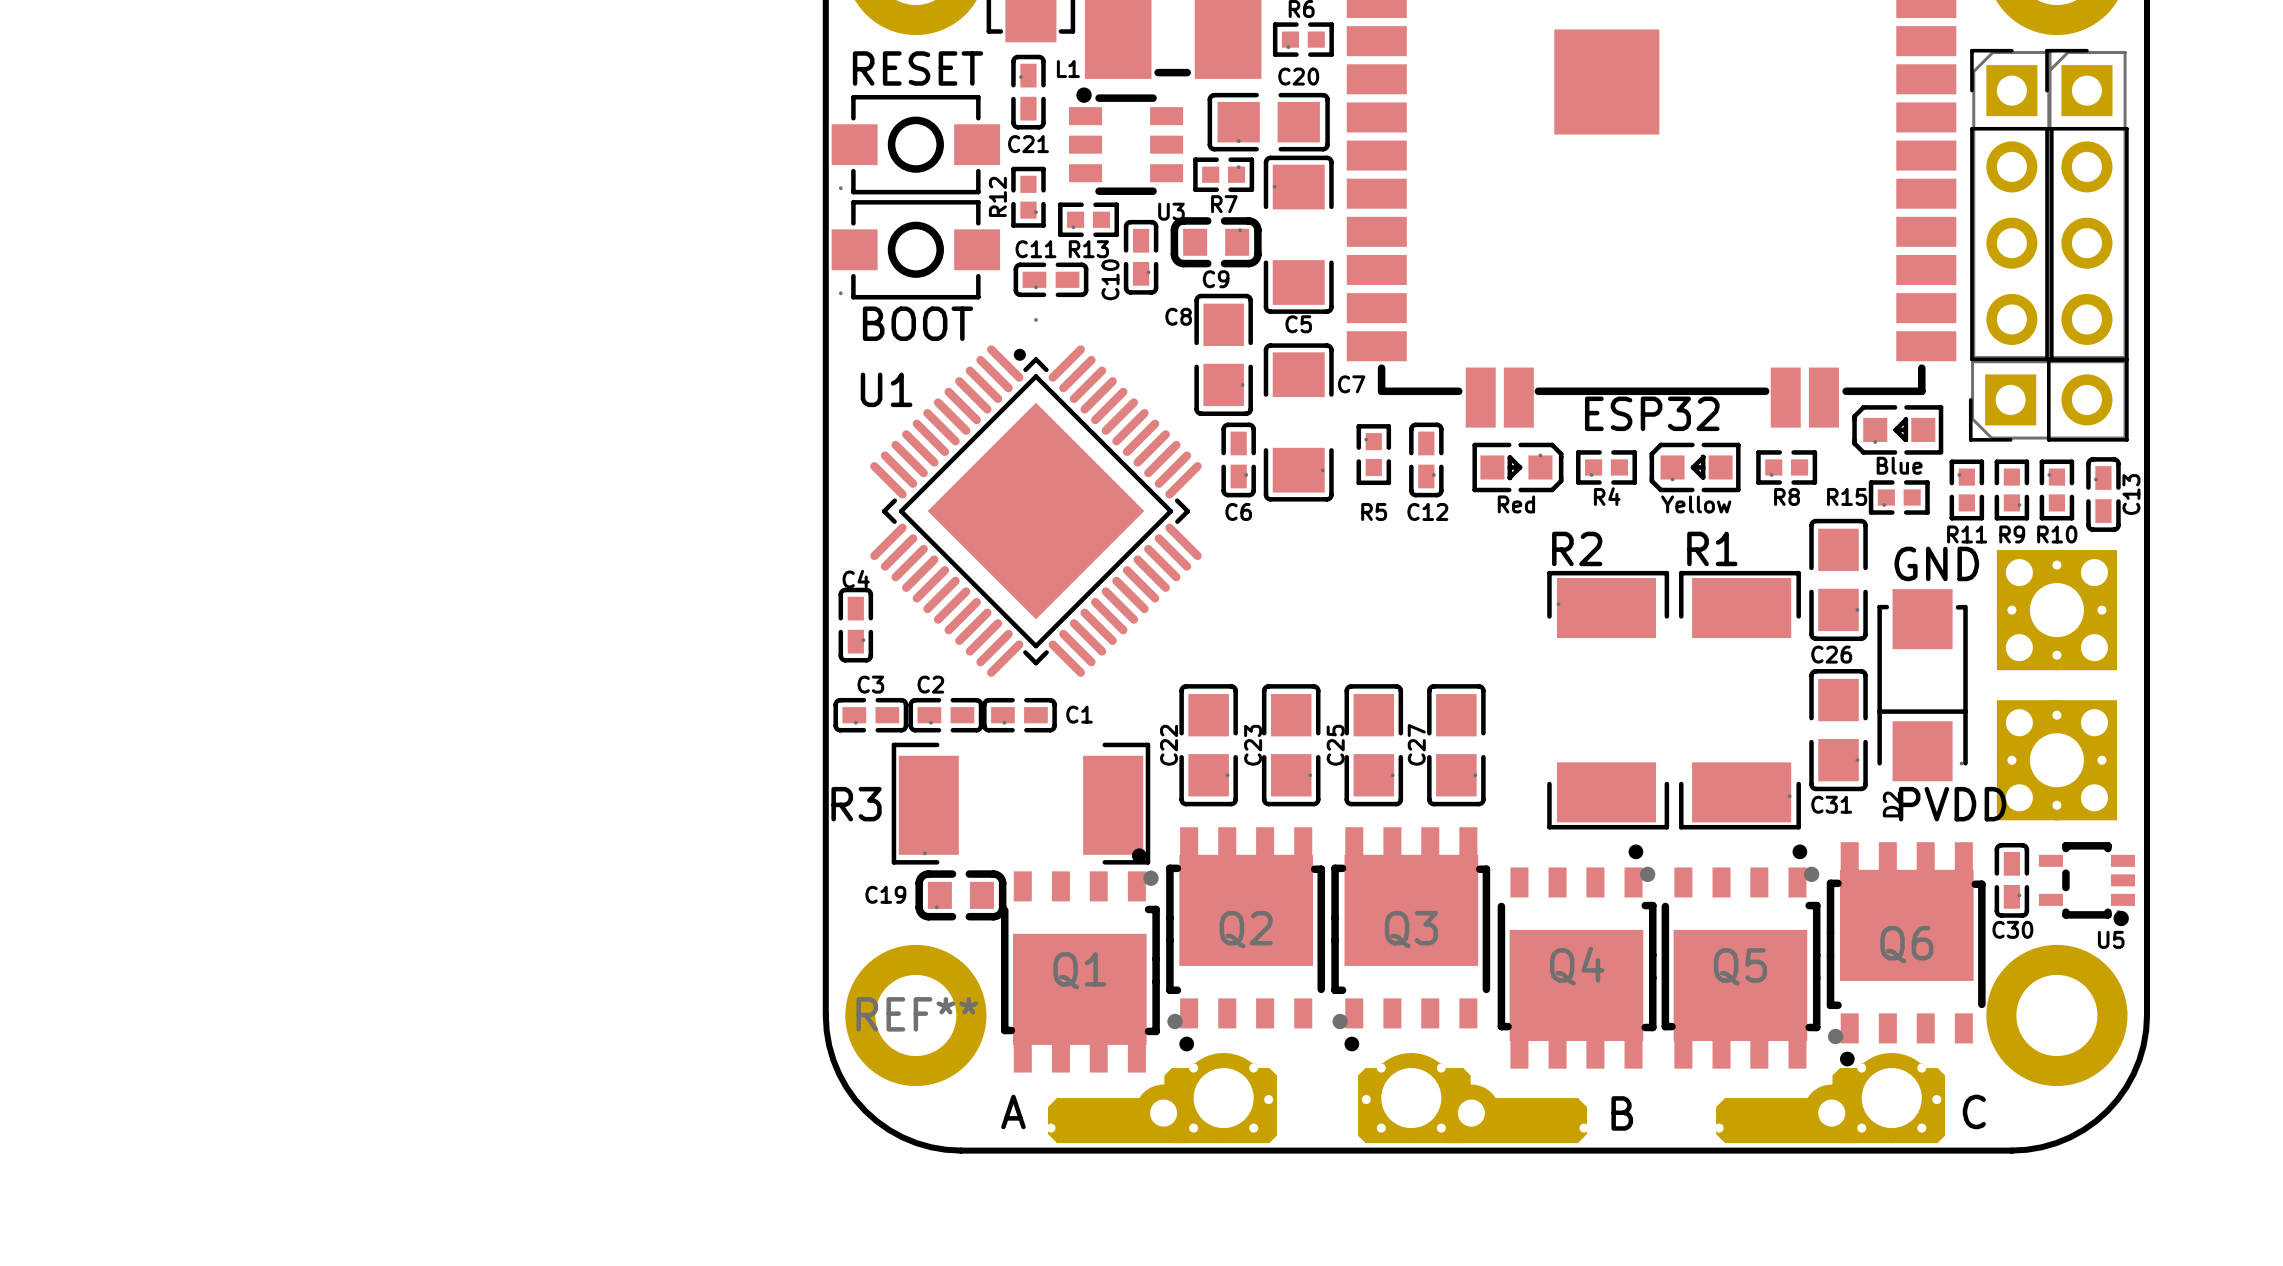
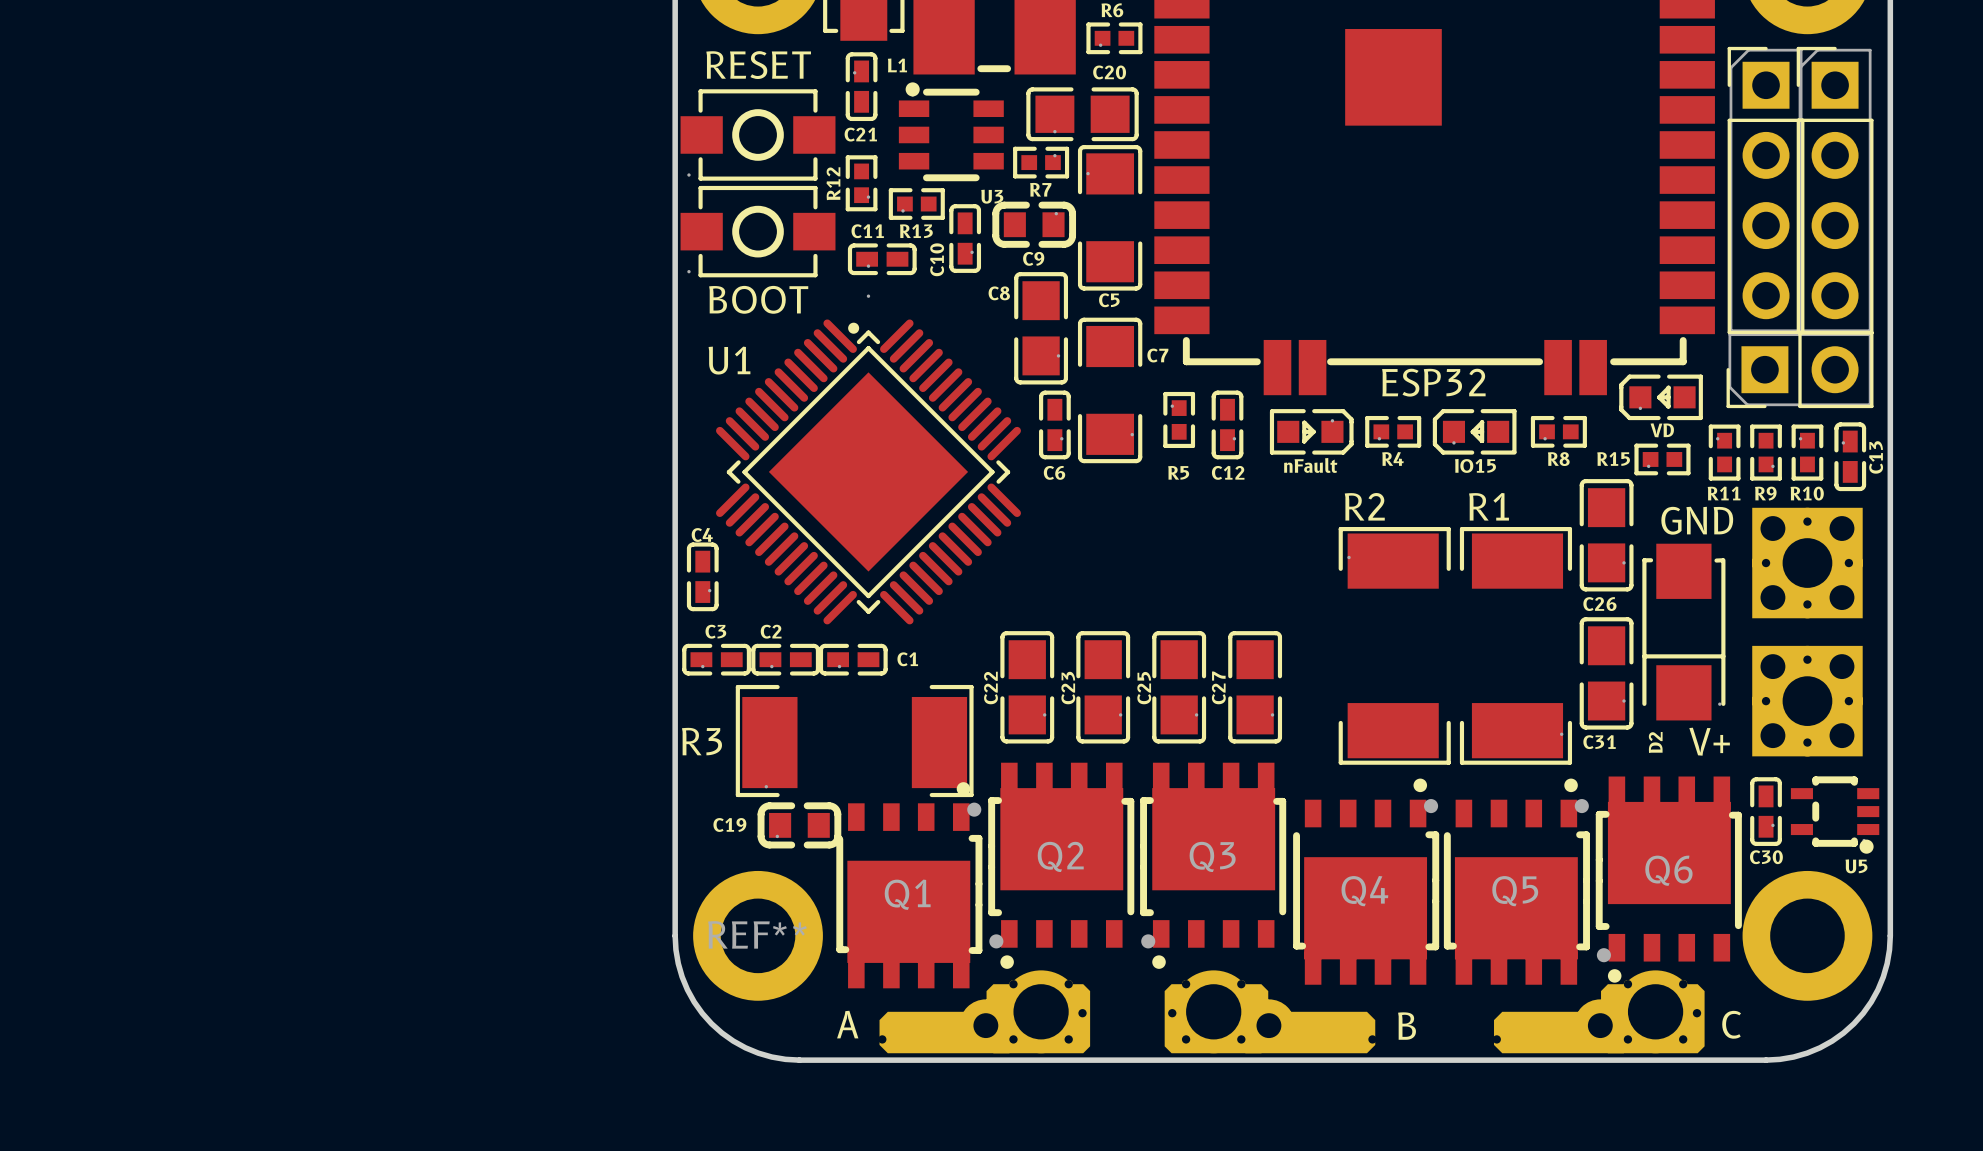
part value: Blue (1899, 465) -> VD (1662, 430)
part value: Red (1516, 504) -> nFault (1310, 465)
part value: Yellow (1696, 504) -> IO15 (1475, 465)
part value: PVDD (1952, 804) -> V+ (1709, 741)

